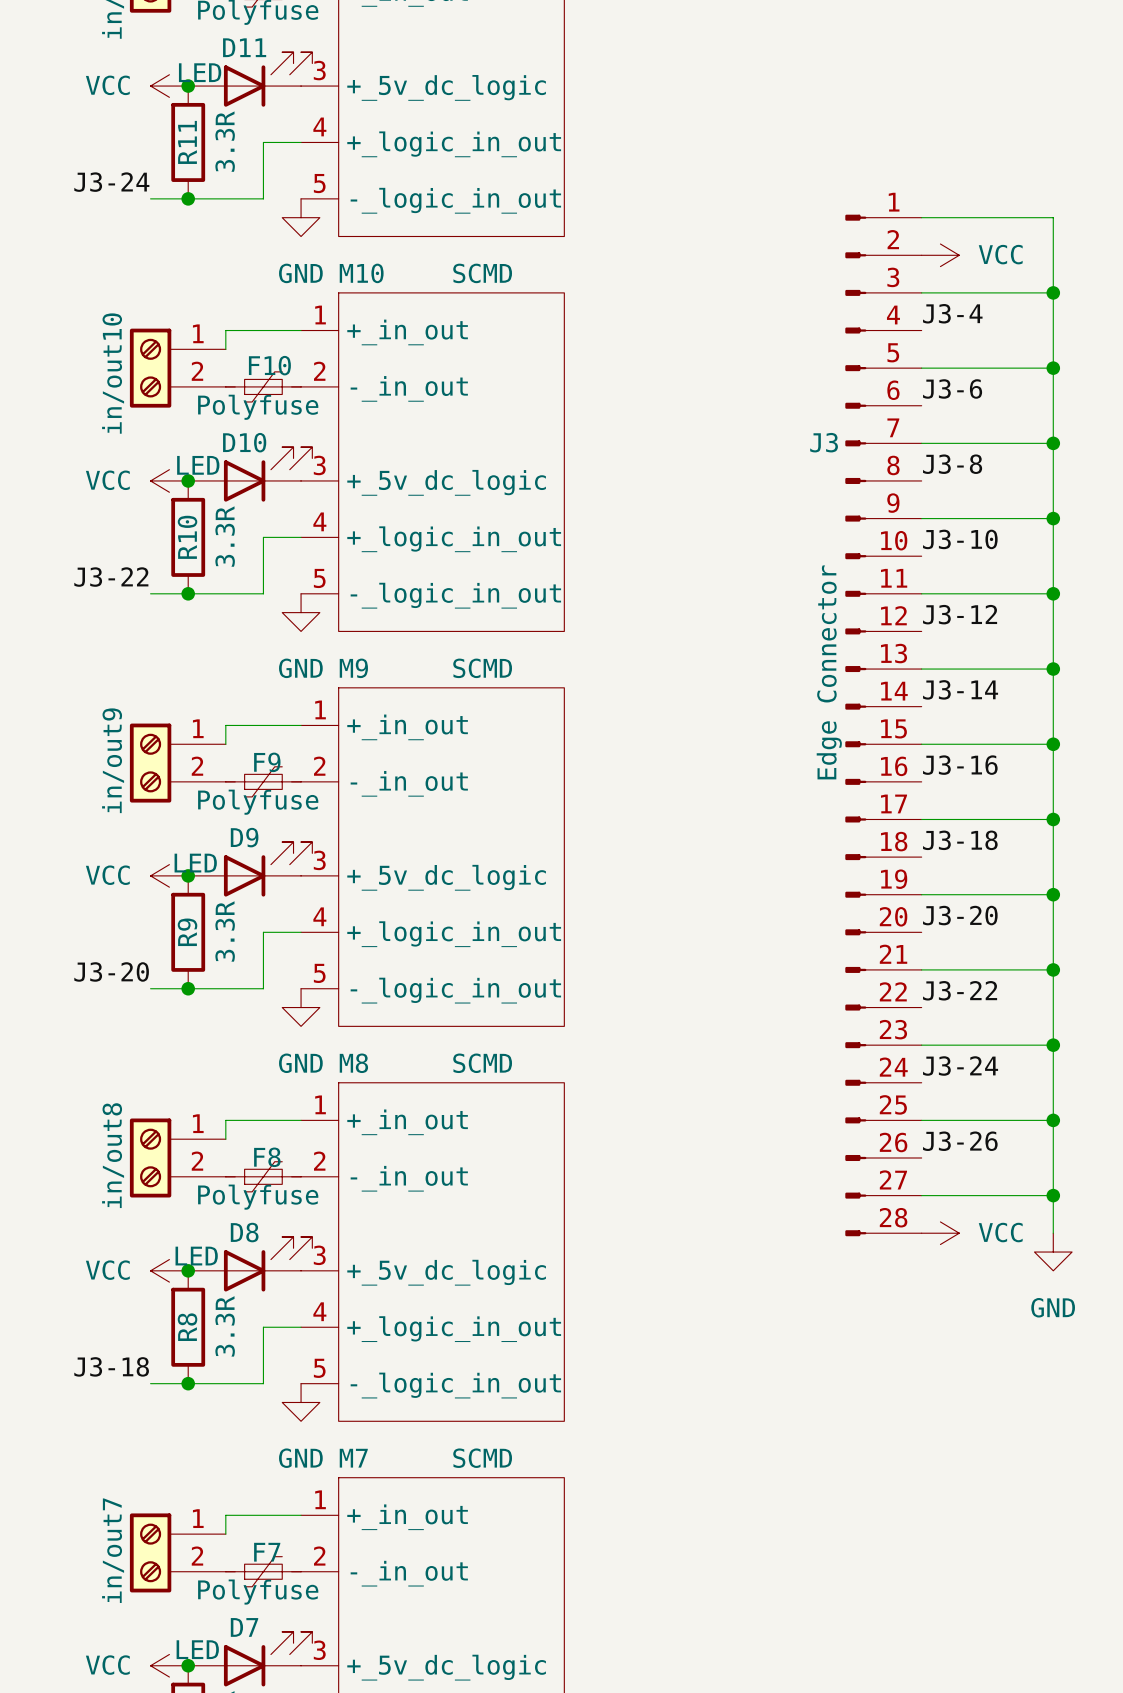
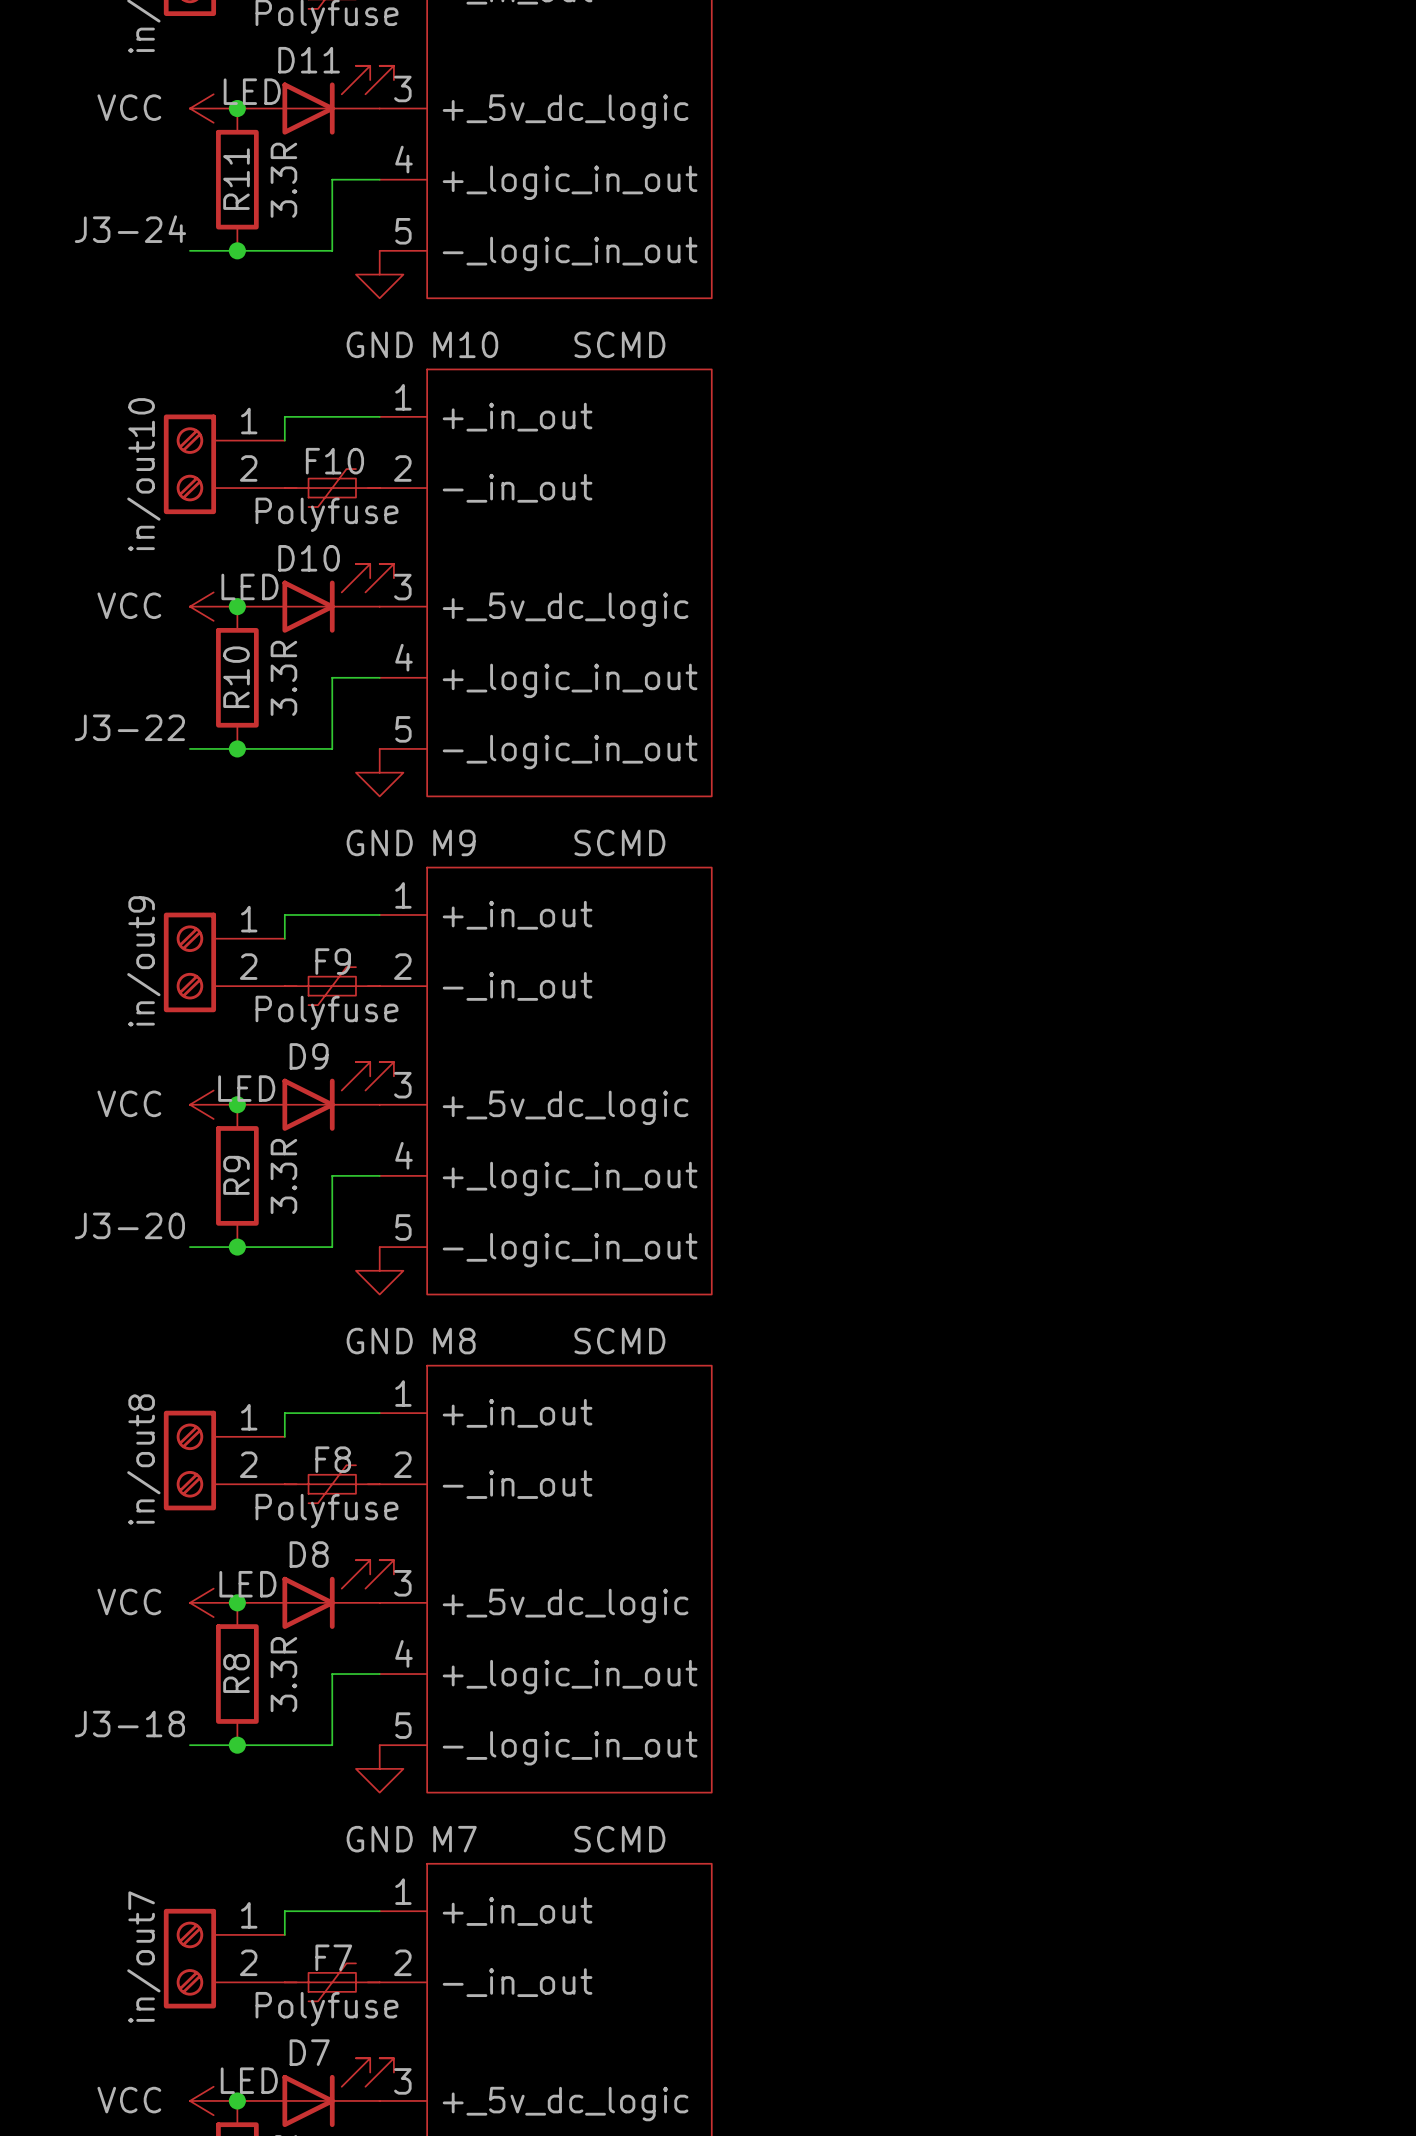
wire: (921, 217) (1053, 217) (1053, 1233) -> none
power symbol: VCC (940, 255) -> none
wire: (921, 292) (1053, 292) -> none
junction: (1053, 292) -> none
label: J3-4 (952, 313) -> none
wire: (921, 368) (1053, 368) -> none
junction: (1053, 368) -> none
label: J3-6 (952, 388) -> none
wire: (921, 443) (1053, 443) -> none
junction: (1053, 443) -> none
label: J3-8 (952, 464) -> none
wire: (921, 518) (1053, 518) -> none
junction: (1053, 518) -> none
label: J3-10 (960, 539) -> none
wire: (921, 593) (1053, 593) -> none
junction: (1053, 593) -> none
label: J3-12 (960, 614) -> none
wire: (921, 669) (1053, 669) -> none
junction: (1053, 669) -> none
label: J3-14 (960, 689) -> none
J3: Edge Connector (883, 725) -> none
wire: (921, 744) (1053, 744) -> none
junction: (1053, 744) -> none
label: J3-16 (960, 765) -> none
wire: (921, 819) (1053, 819) -> none
junction: (1053, 819) -> none
label: J3-18 (960, 840) -> none
wire: (921, 894) (1053, 894) -> none
junction: (1053, 894) -> none
label: J3-20 (960, 915) -> none
wire: (921, 969) (1053, 969) -> none
junction: (1053, 969) -> none
label: J3-22 (960, 990) -> none
wire: (921, 1045) (1053, 1045) -> none
junction: (1053, 1045) -> none
label: J3-24 (960, 1066) -> none
wire: (921, 1120) (1053, 1120) -> none
junction: (1053, 1120) -> none
label: J3-26 (960, 1141) -> none
wire: (921, 1195) (1053, 1195) -> none
junction: (1053, 1195) -> none
power symbol: VCC (940, 1233) -> none
power symbol: GND (1053, 1252) -> none

